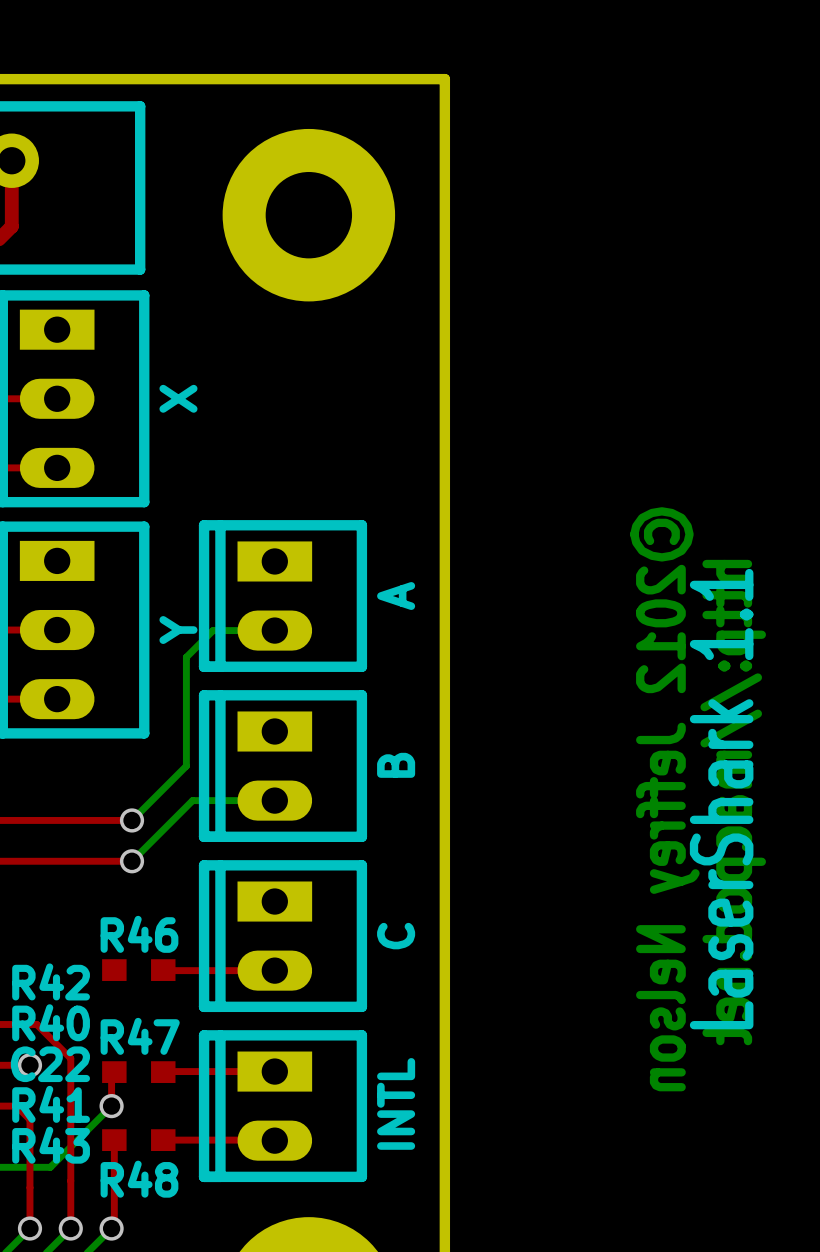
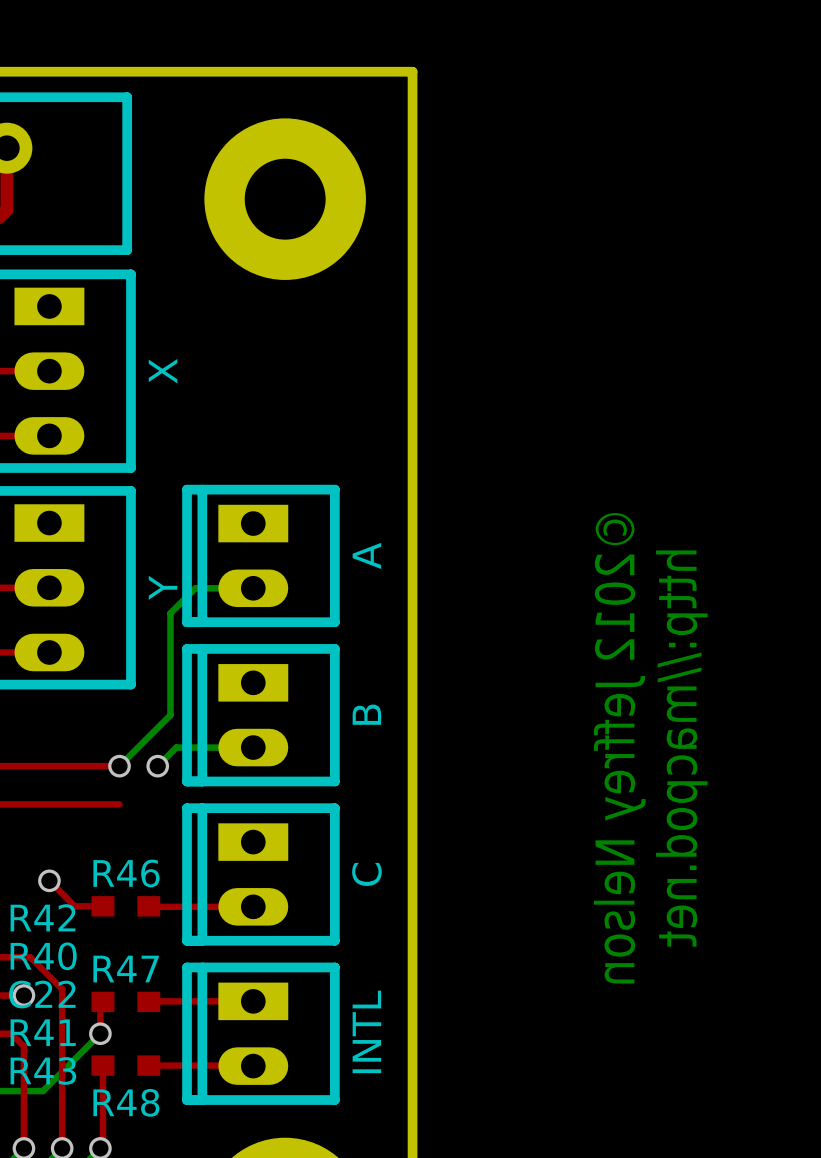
text: LaserShark 1.1 (721, 799) -> none
bottom track: (172, 820) (132, 861) -> none
via: none -> (157, 766)
via: (132, 861) -> none
top track: none -> (49, 880) (74, 906) (102, 906)
via: none -> (49, 880)

